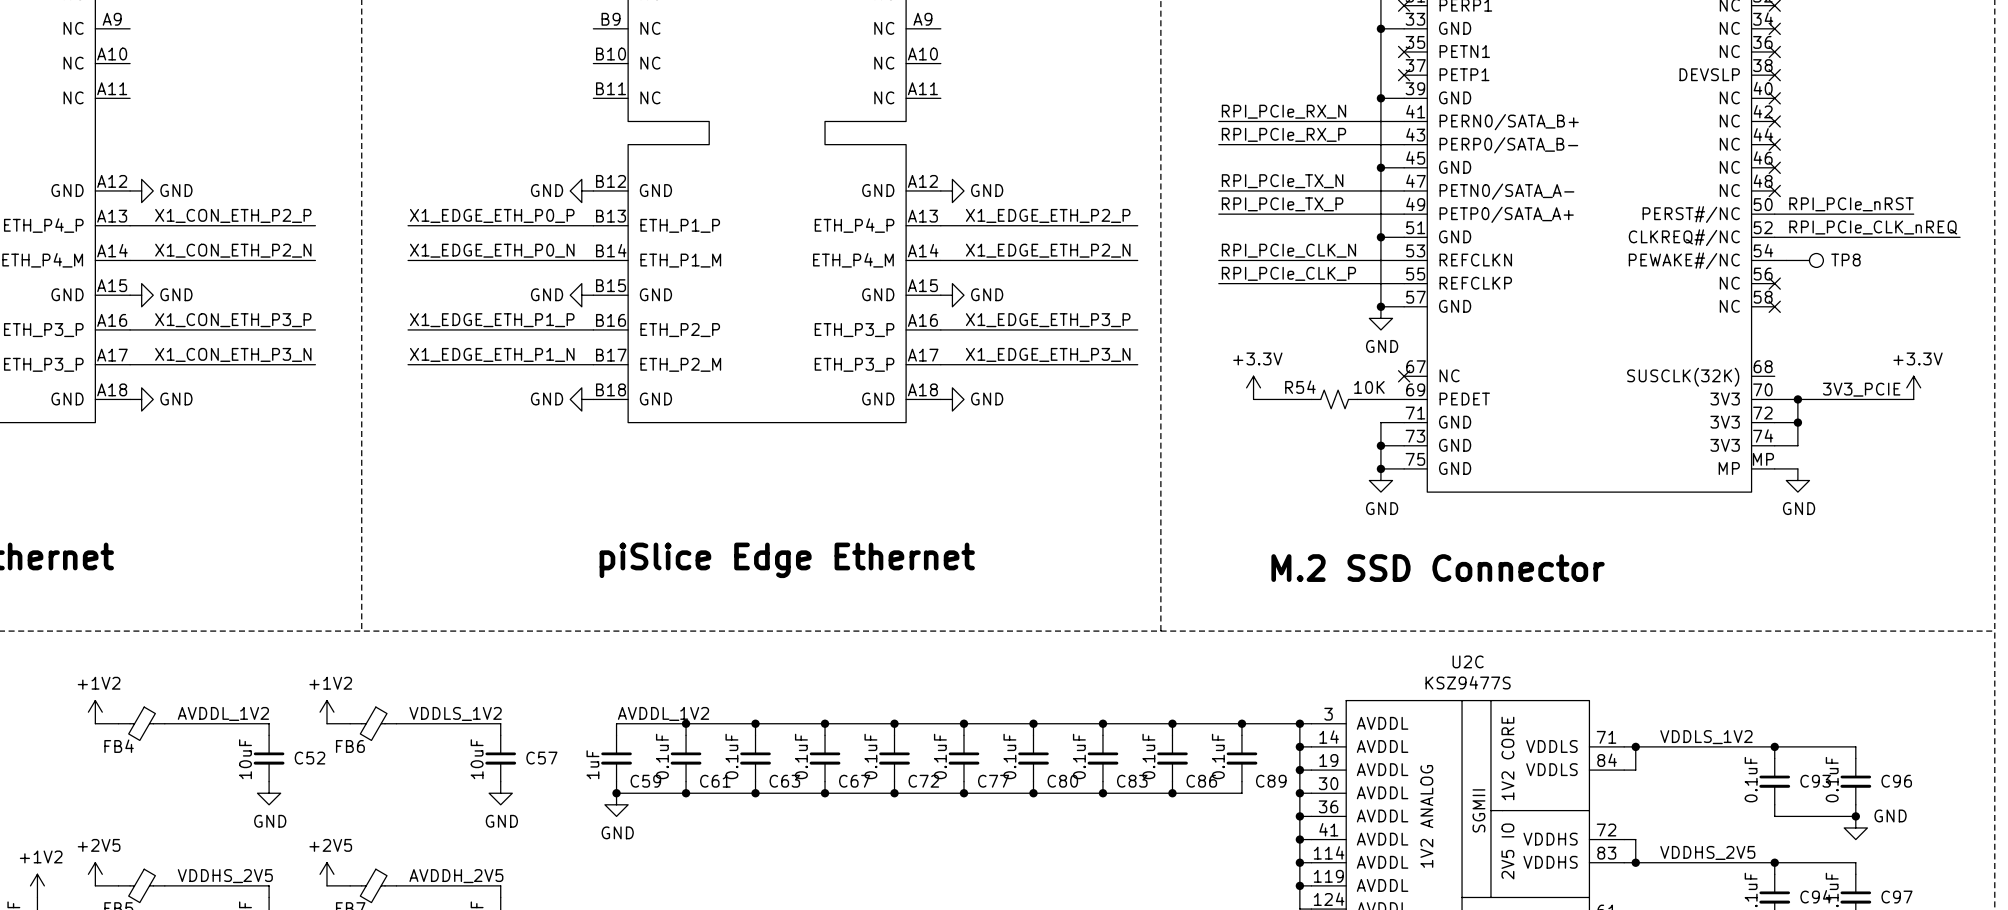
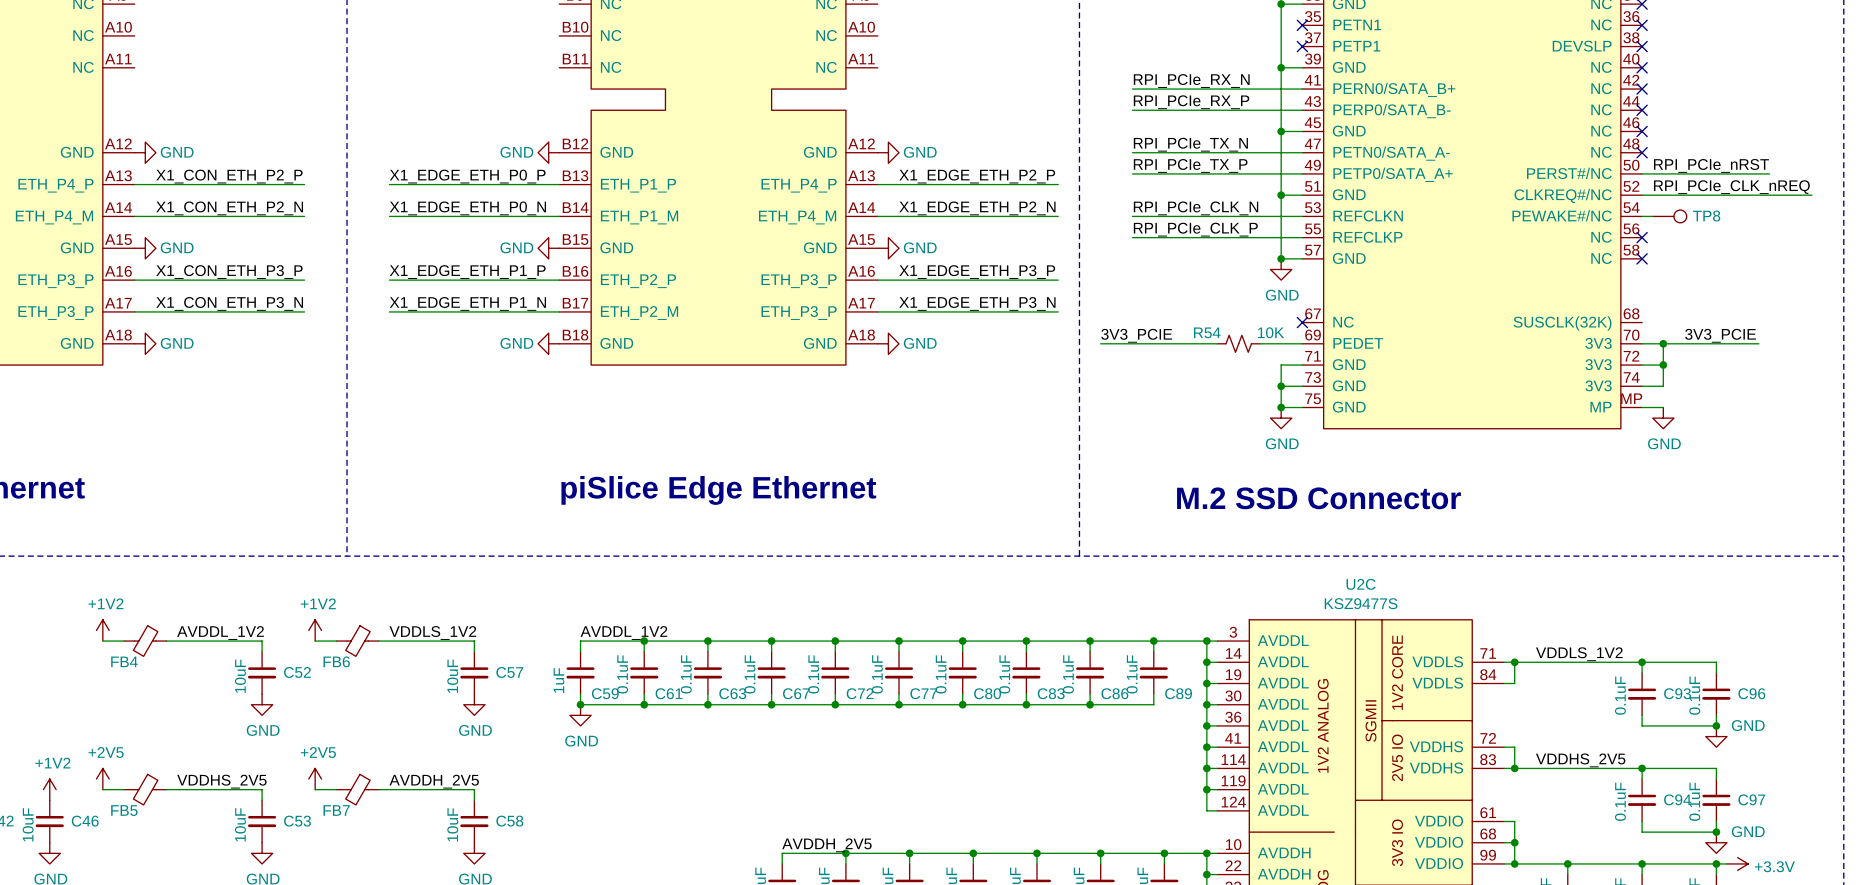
power symbol: +3.3V (1253, 387) -> none
power symbol: +3.3V (1913, 387) -> none
label: none -> 3V3_PCIE (1136, 335)
wire: none -> (1100, 343) (1164, 343)
wire: (1902, 399) (1913, 399) -> none

